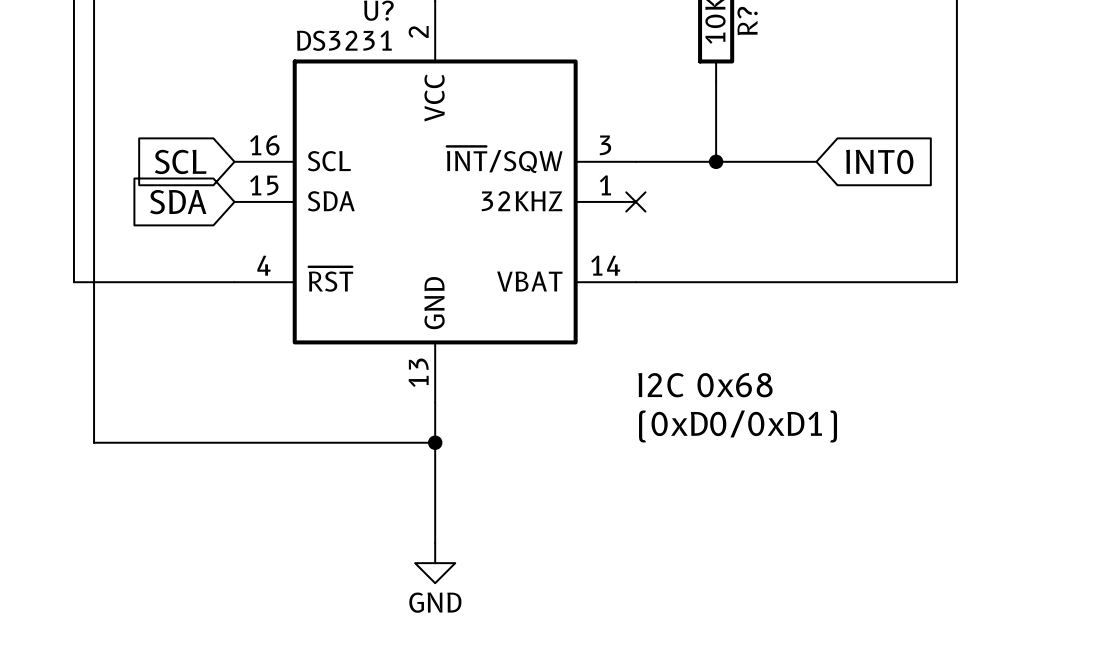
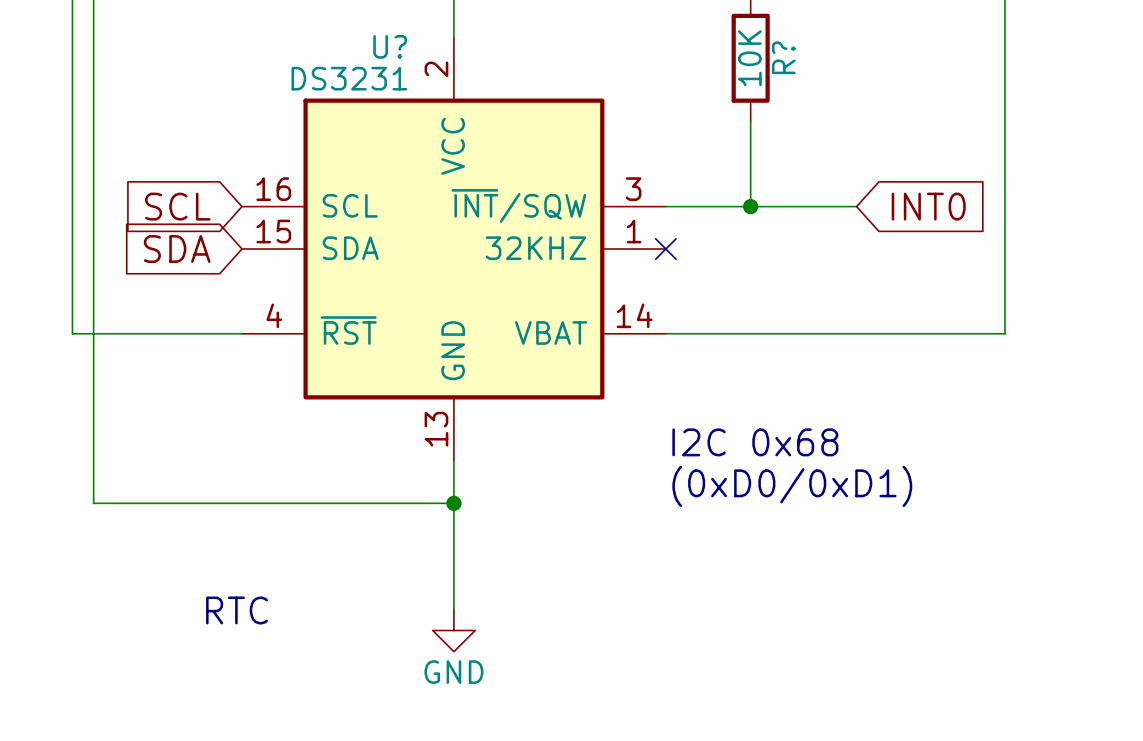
text: none -> RTC (237, 610)

